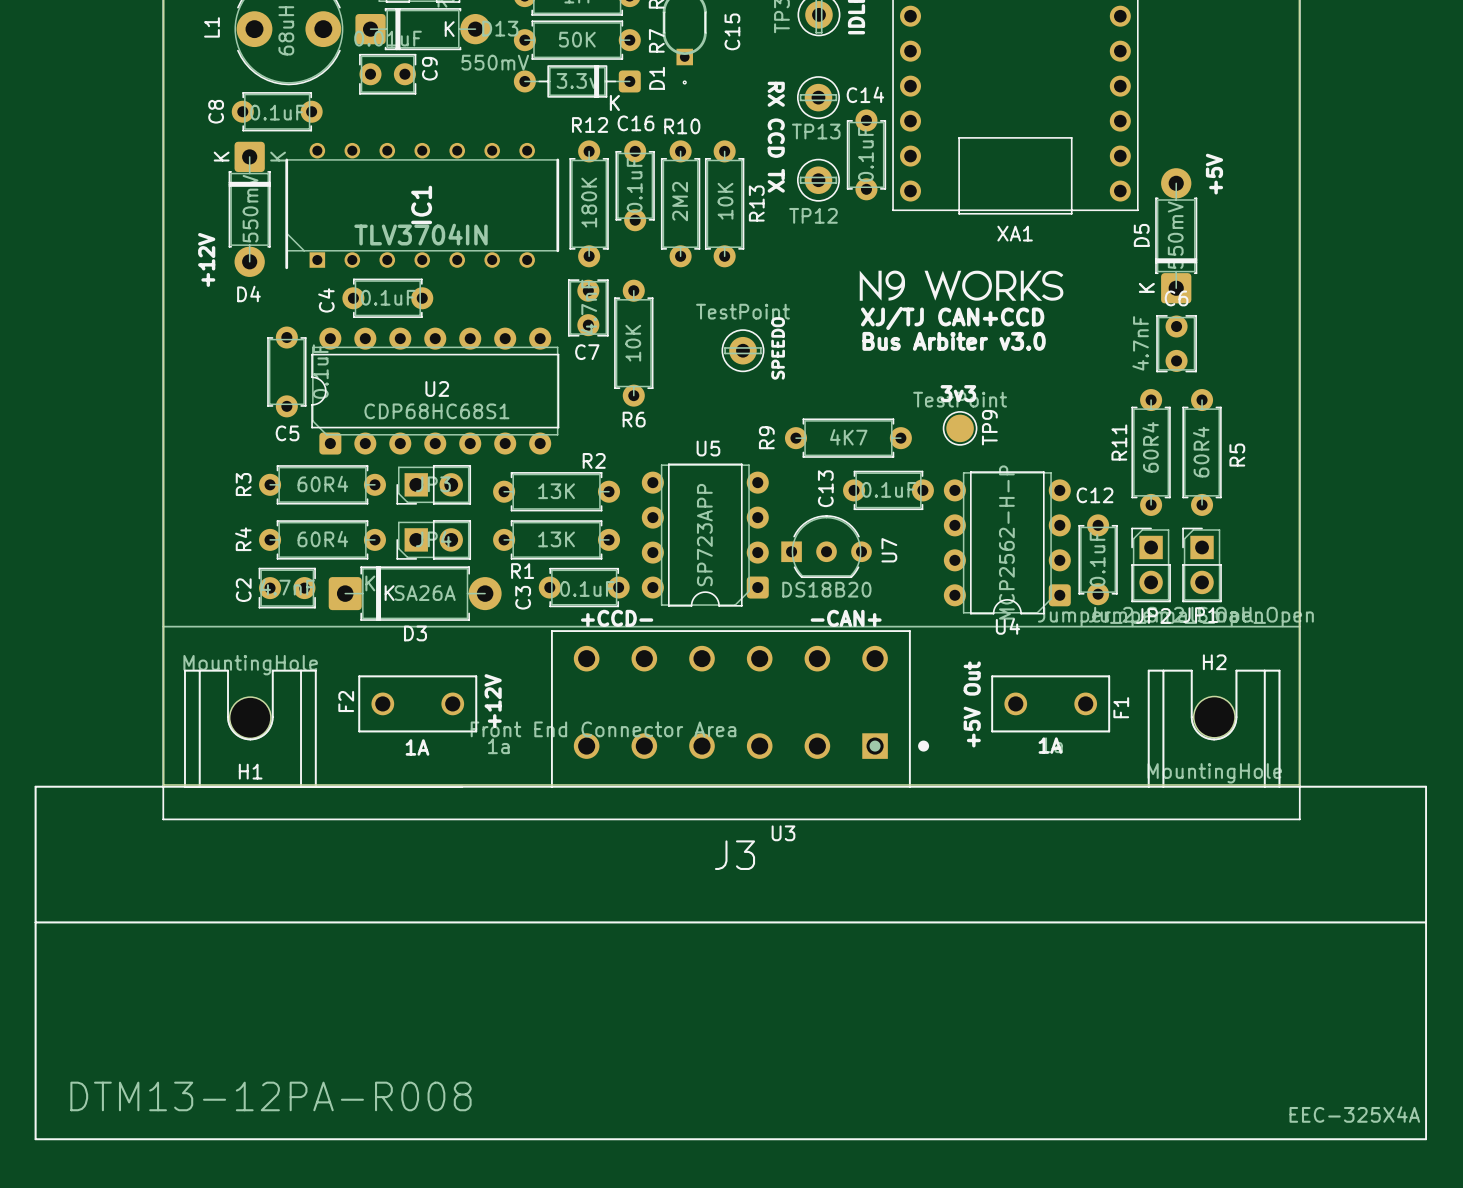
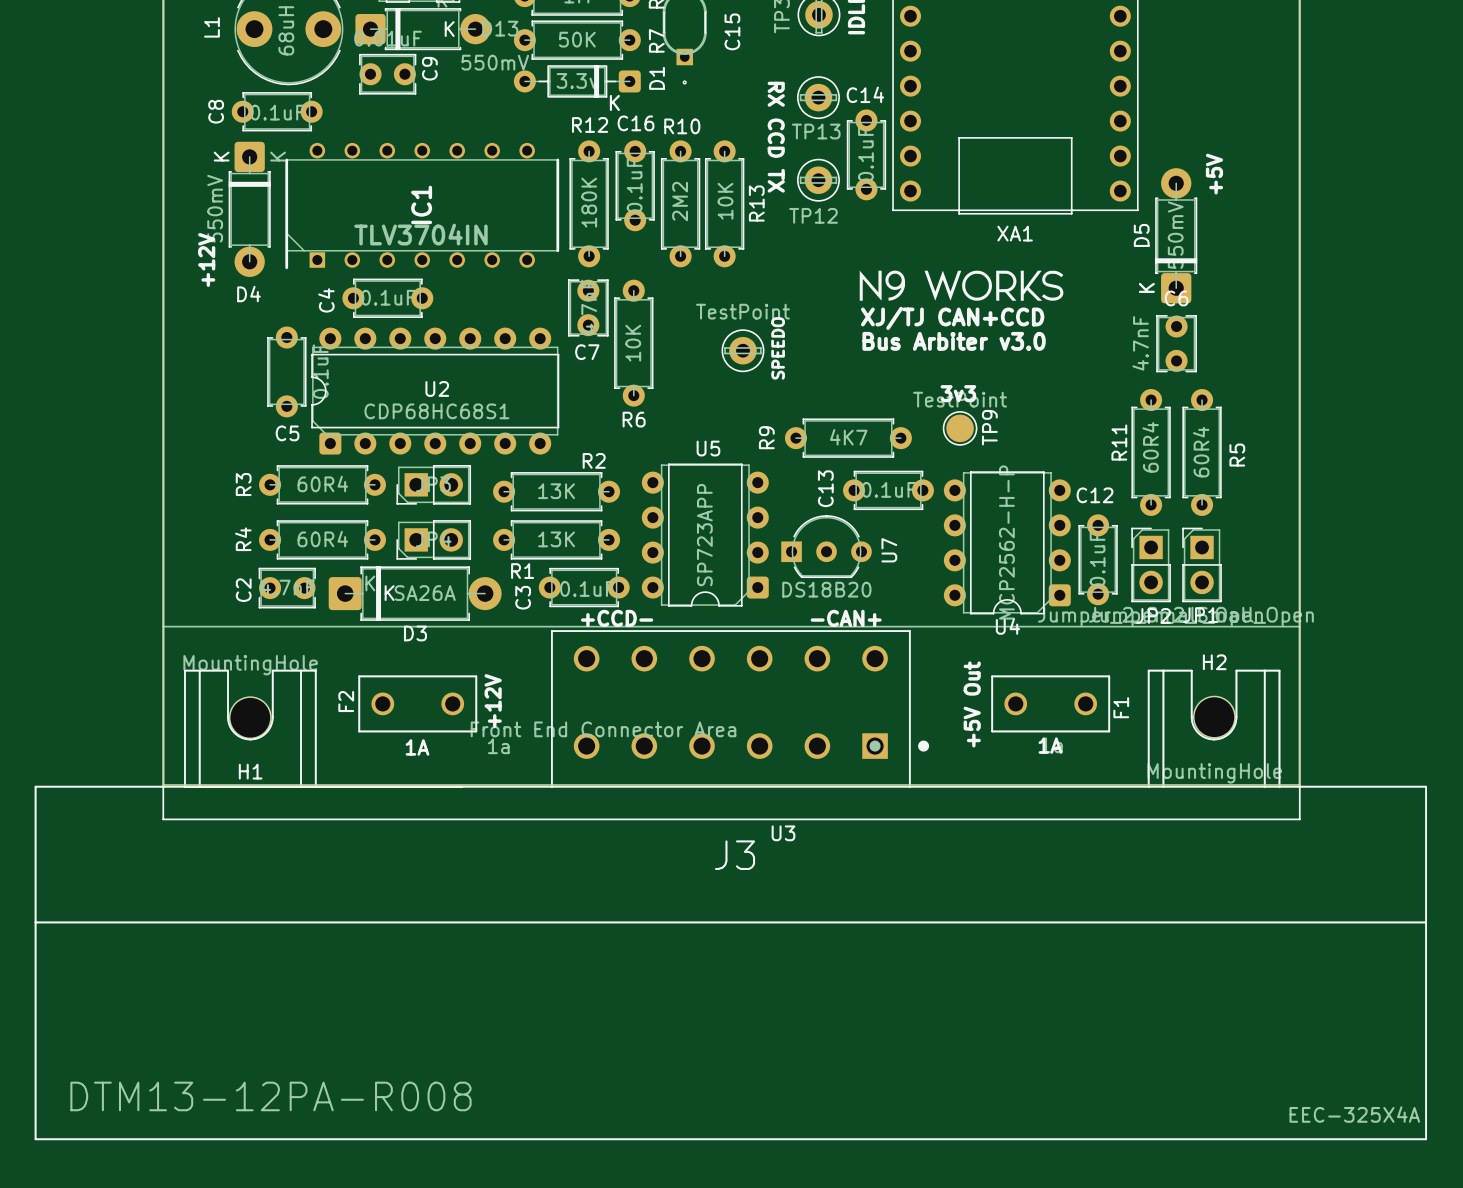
D4 value position: 550mV (250, 208) -> 550mV (215, 208)

